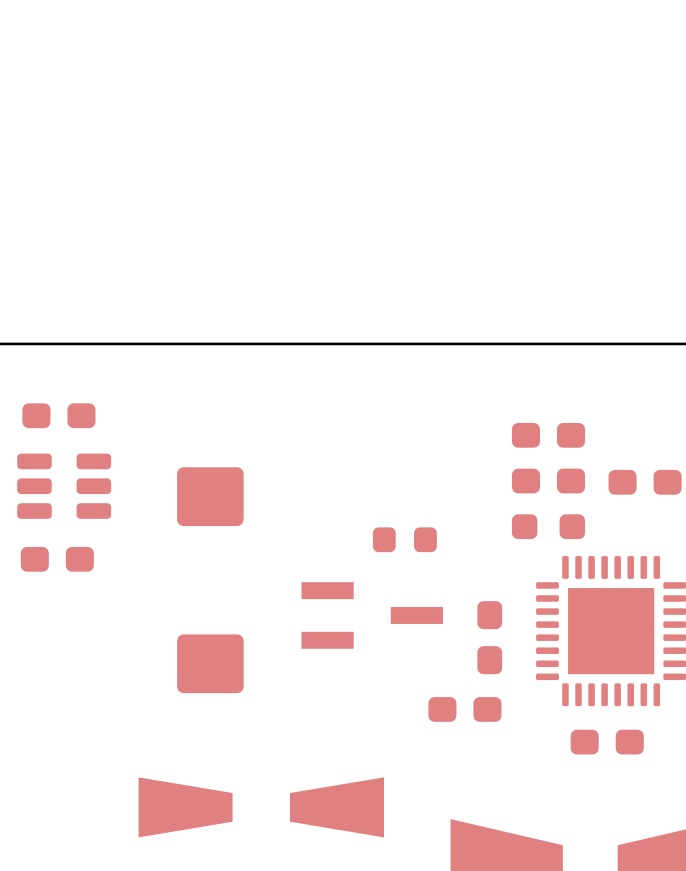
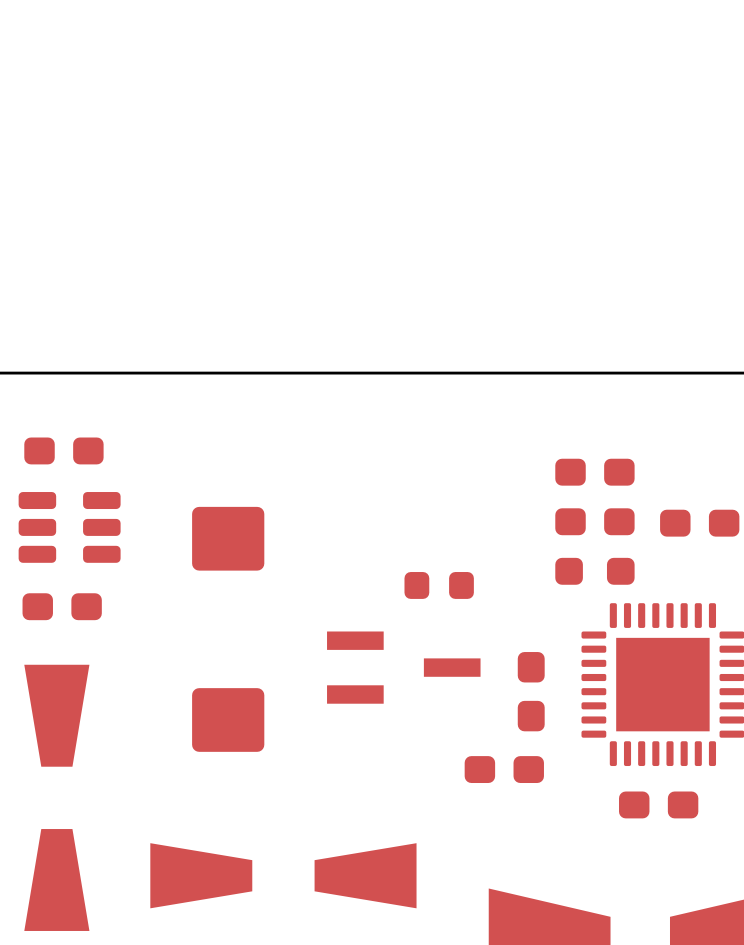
part: none -> (56, 797)

